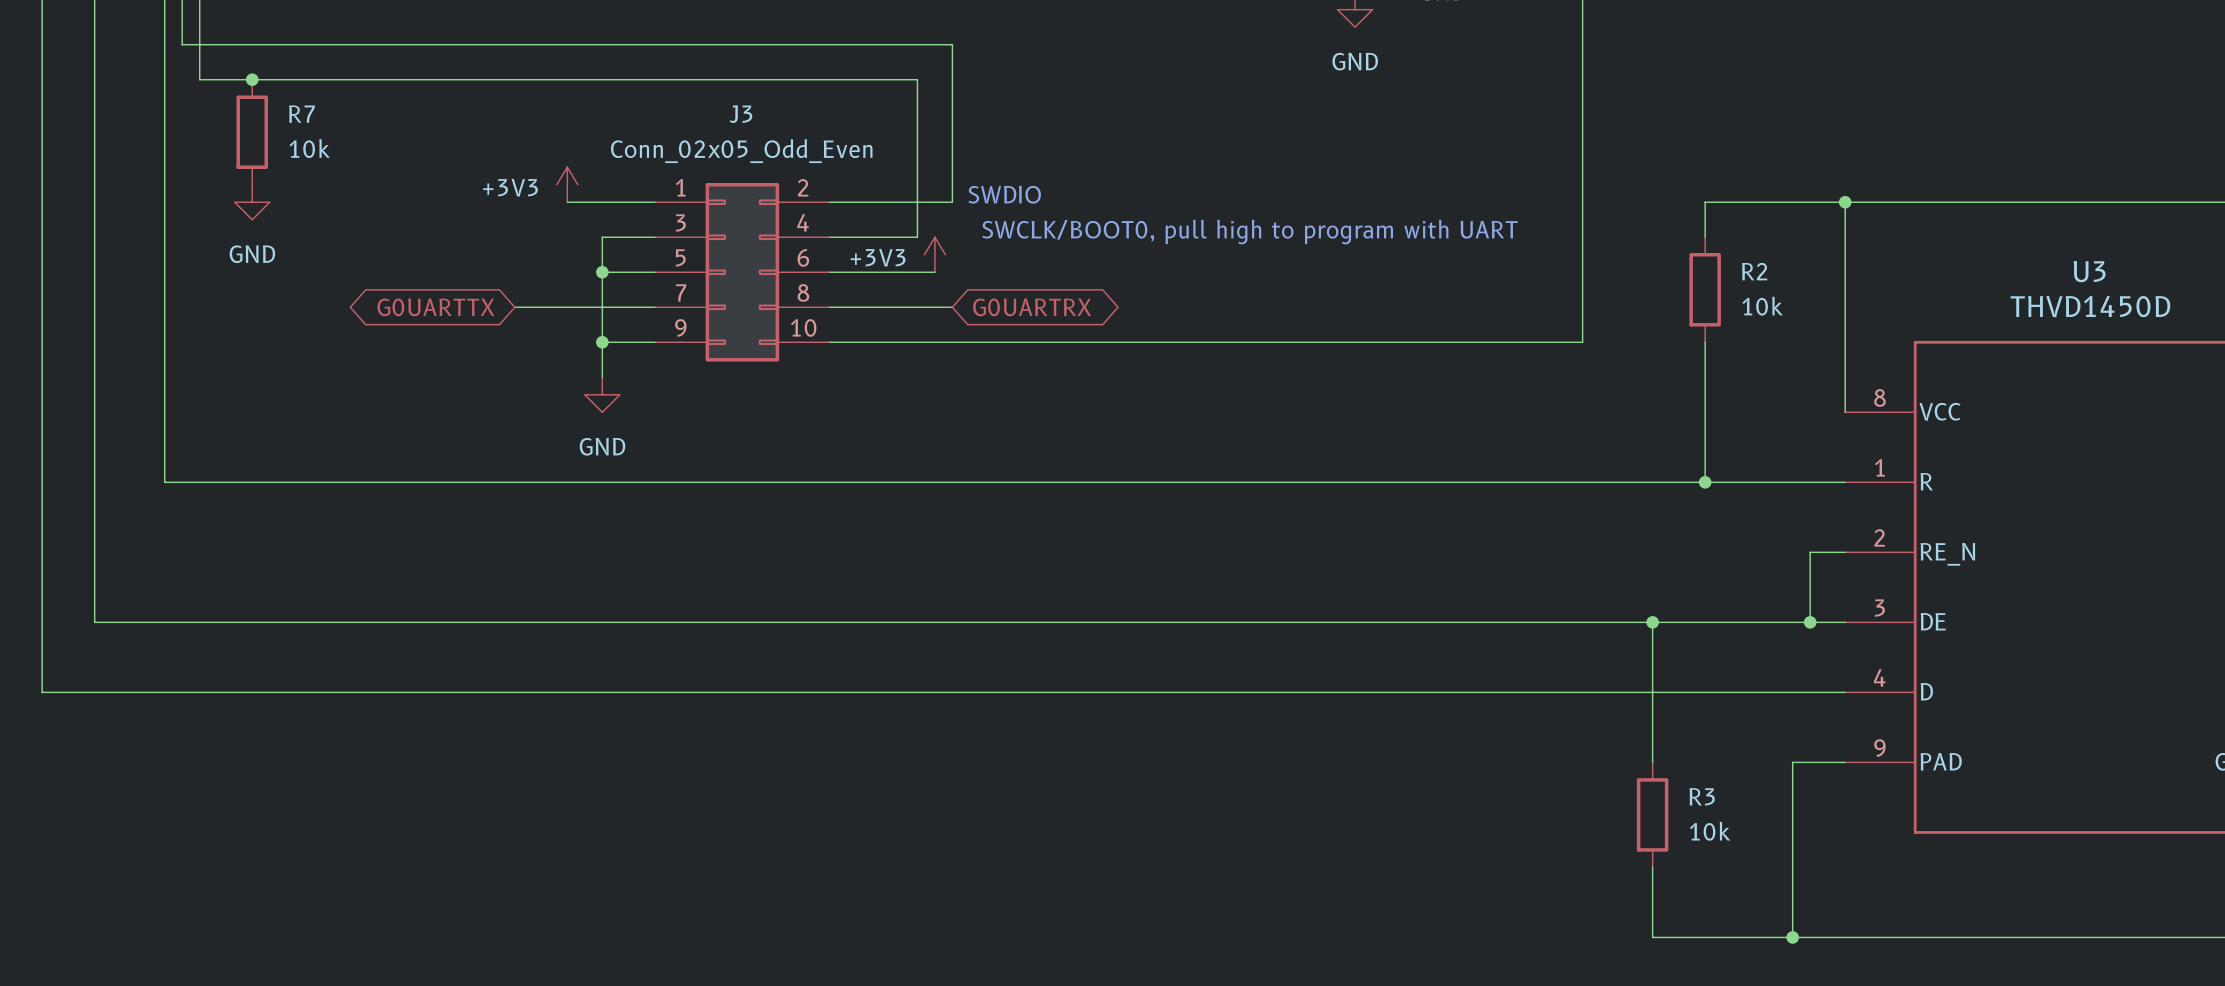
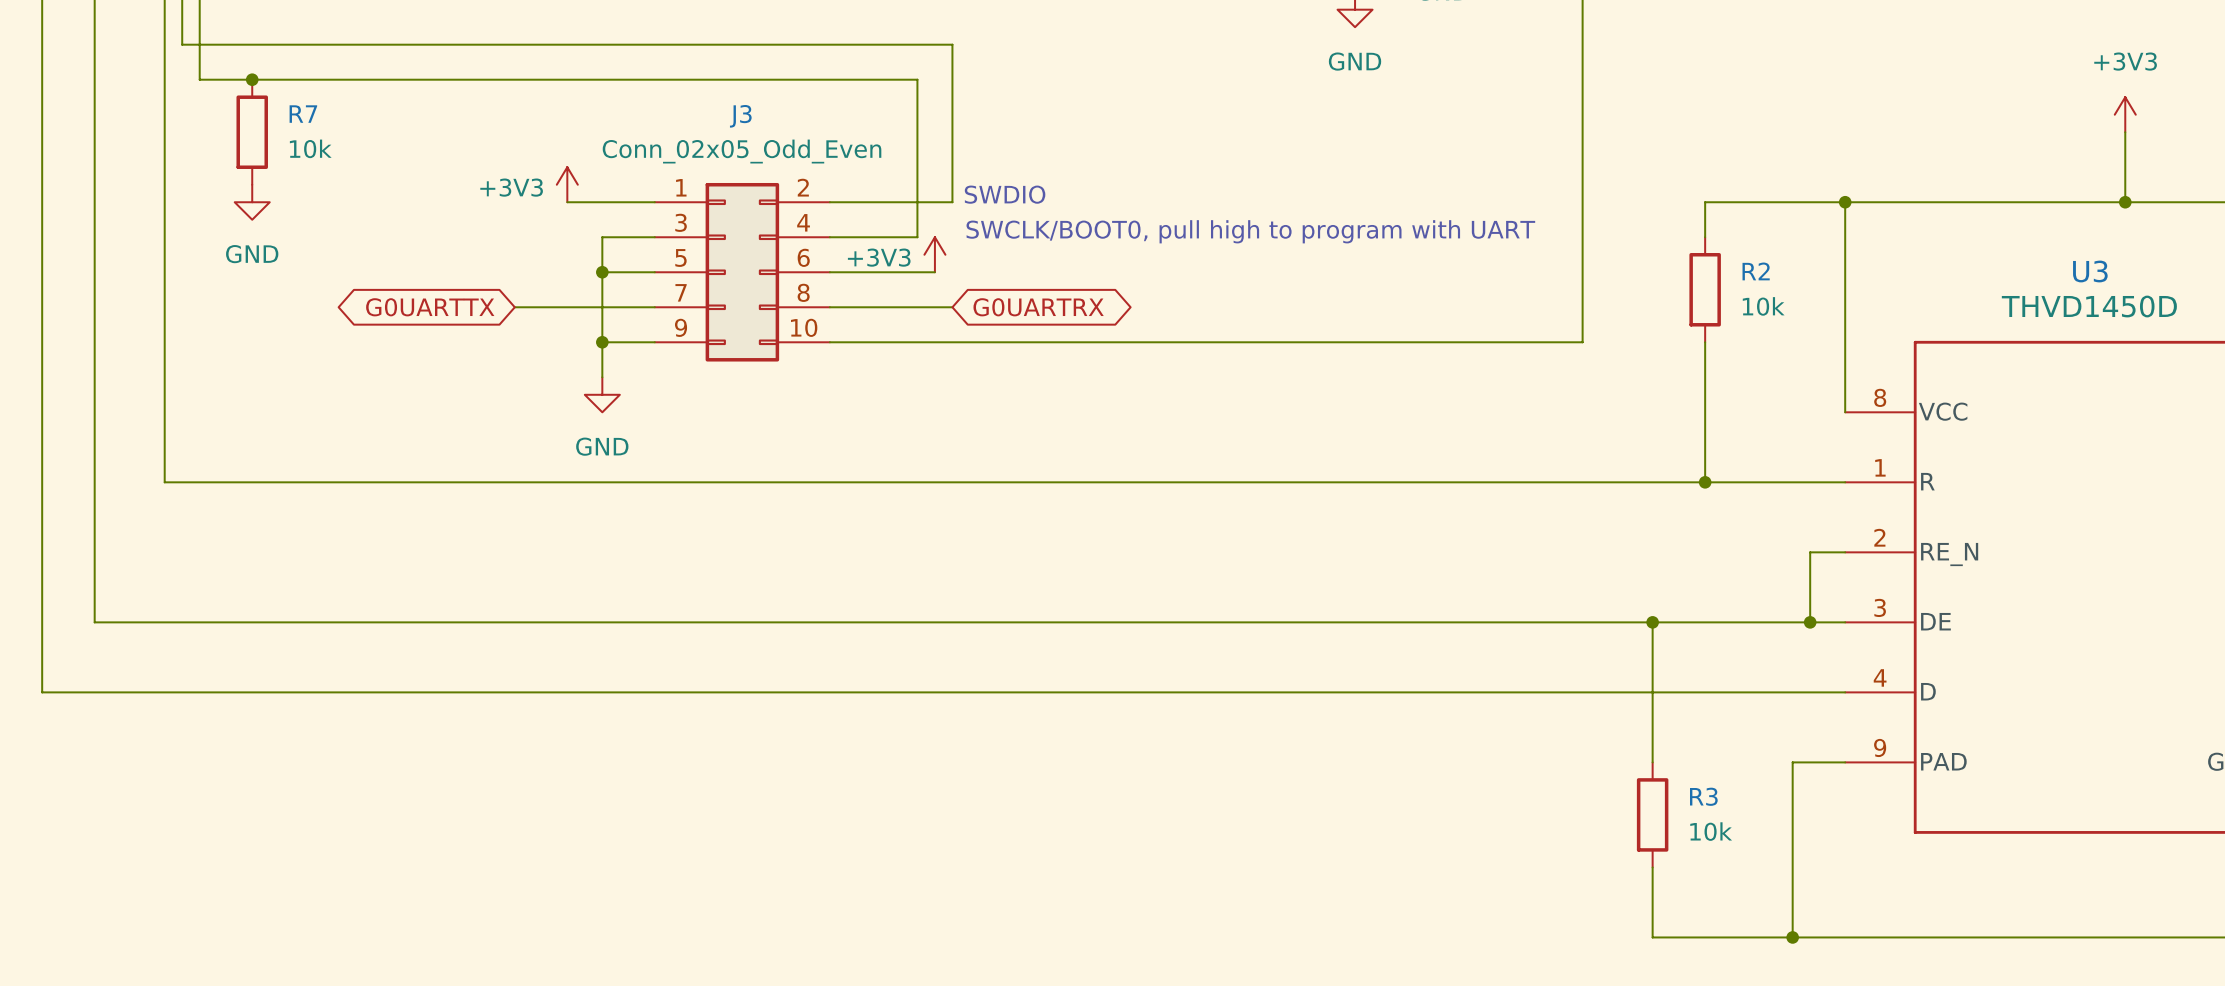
power symbol: none -> +3V3 (2125, 114)
wire: none -> (2125, 132) (2125, 202)
junction: none -> (2125, 202)

